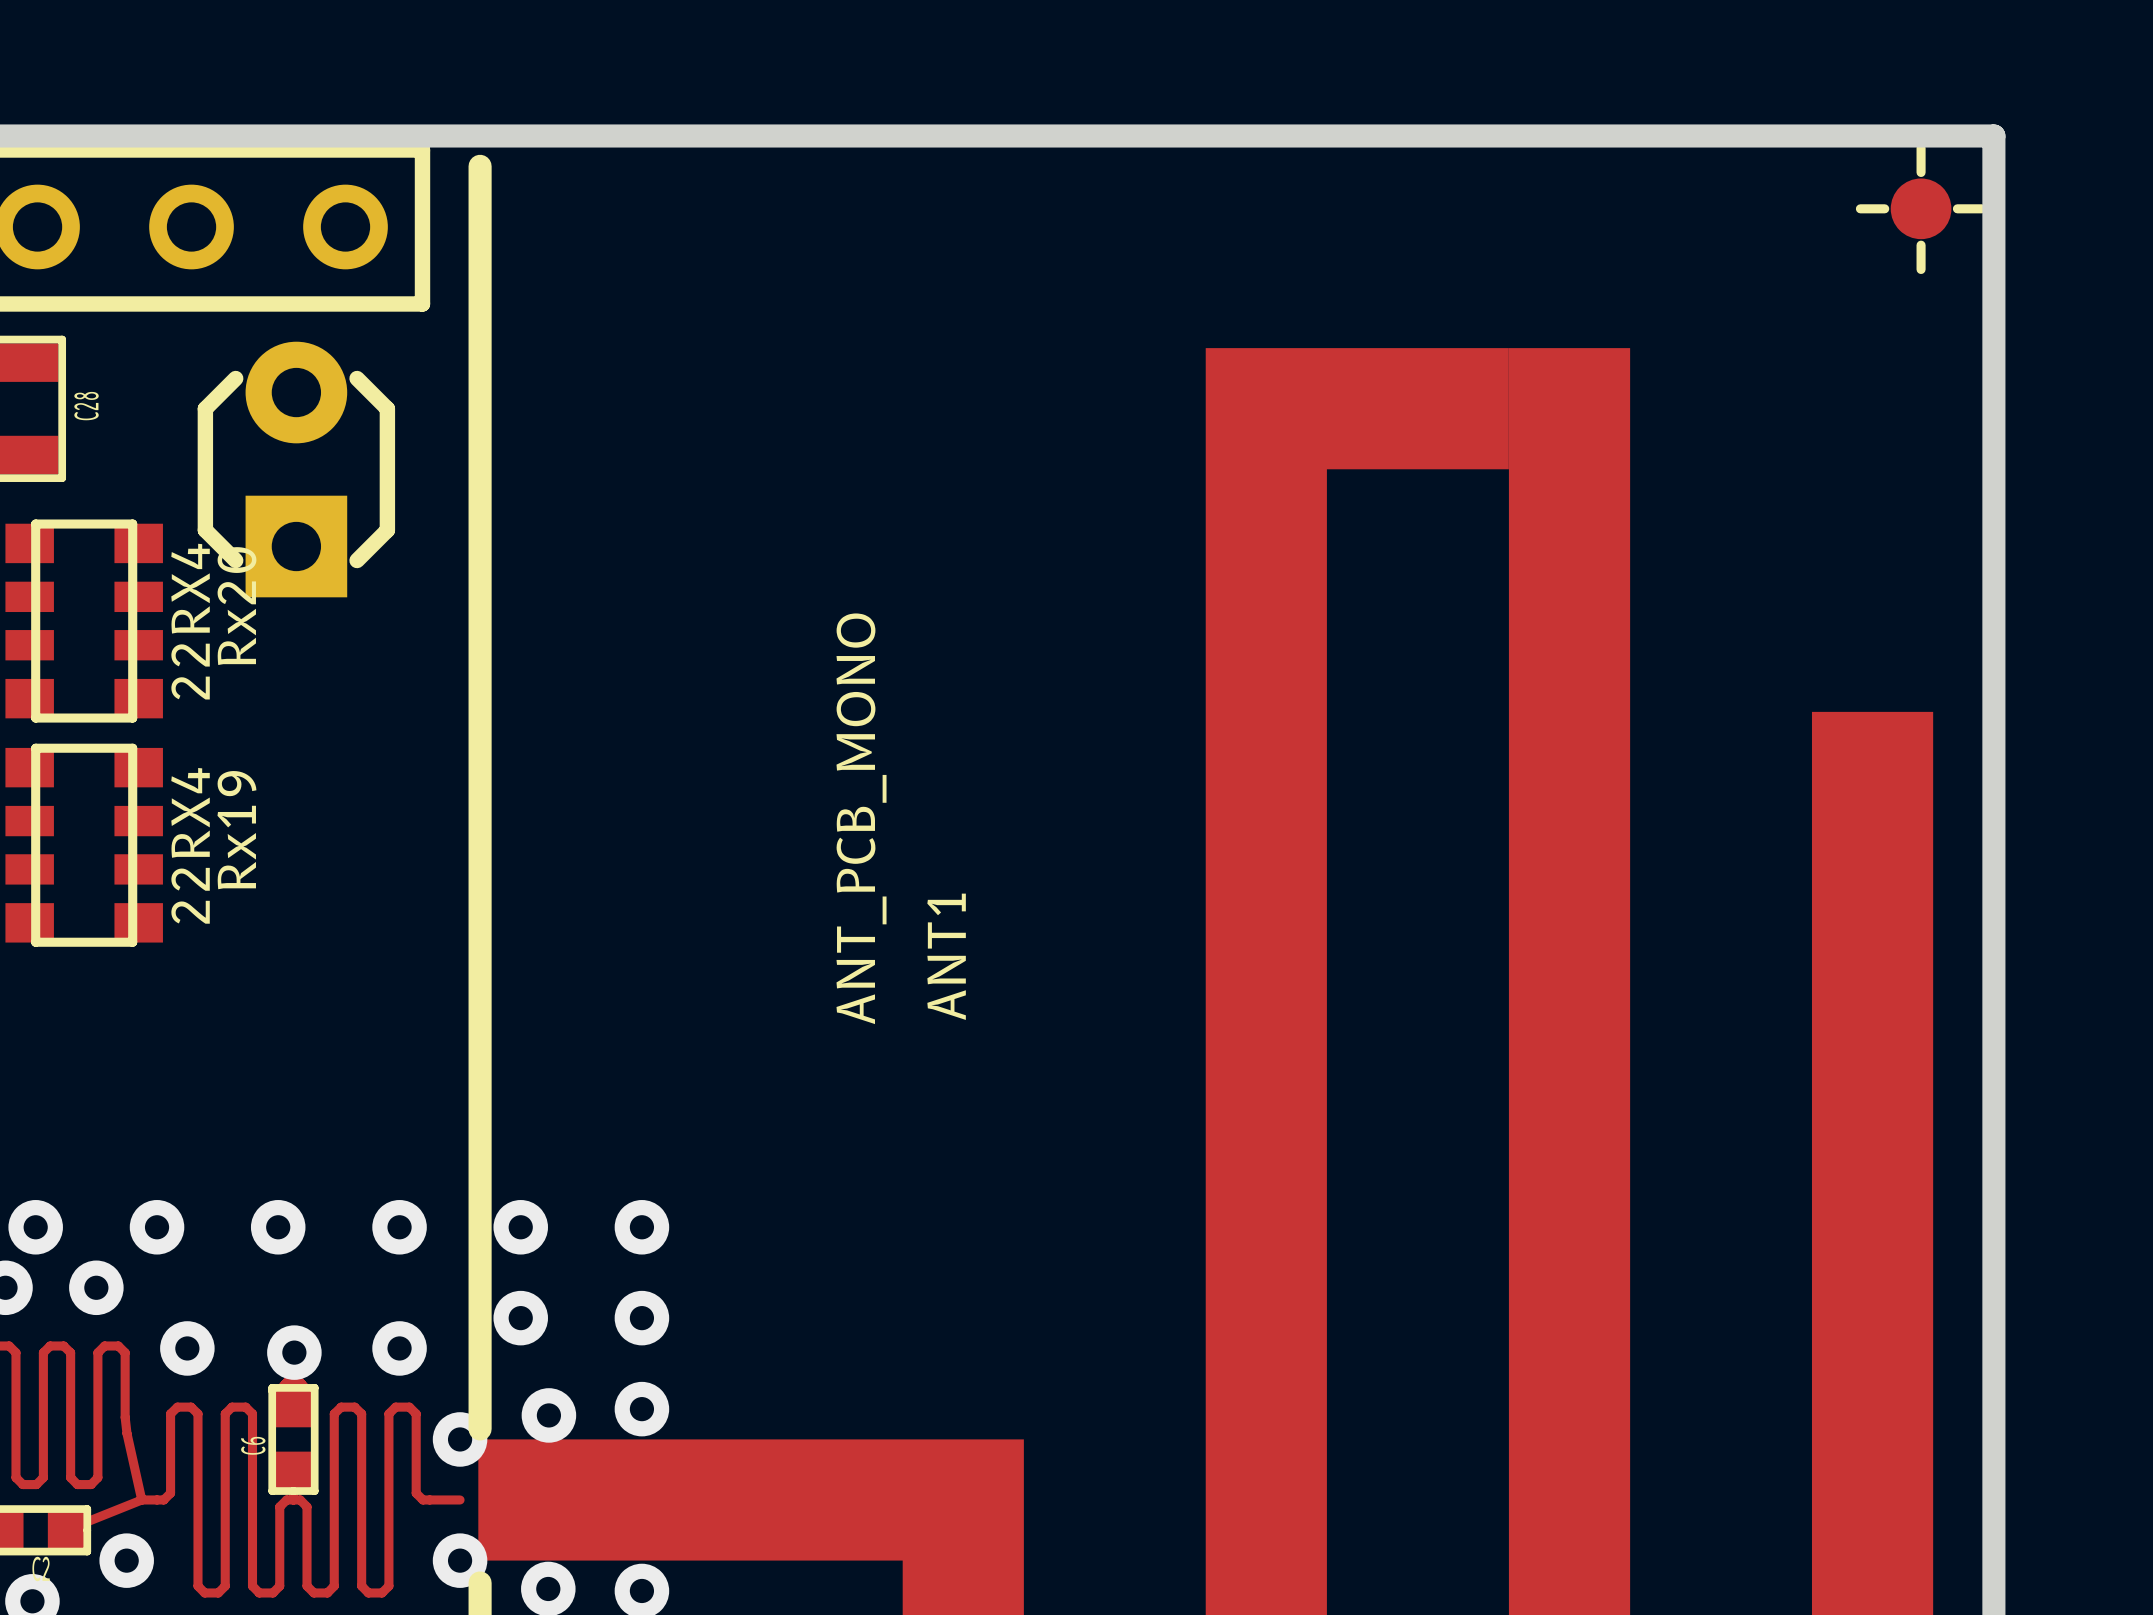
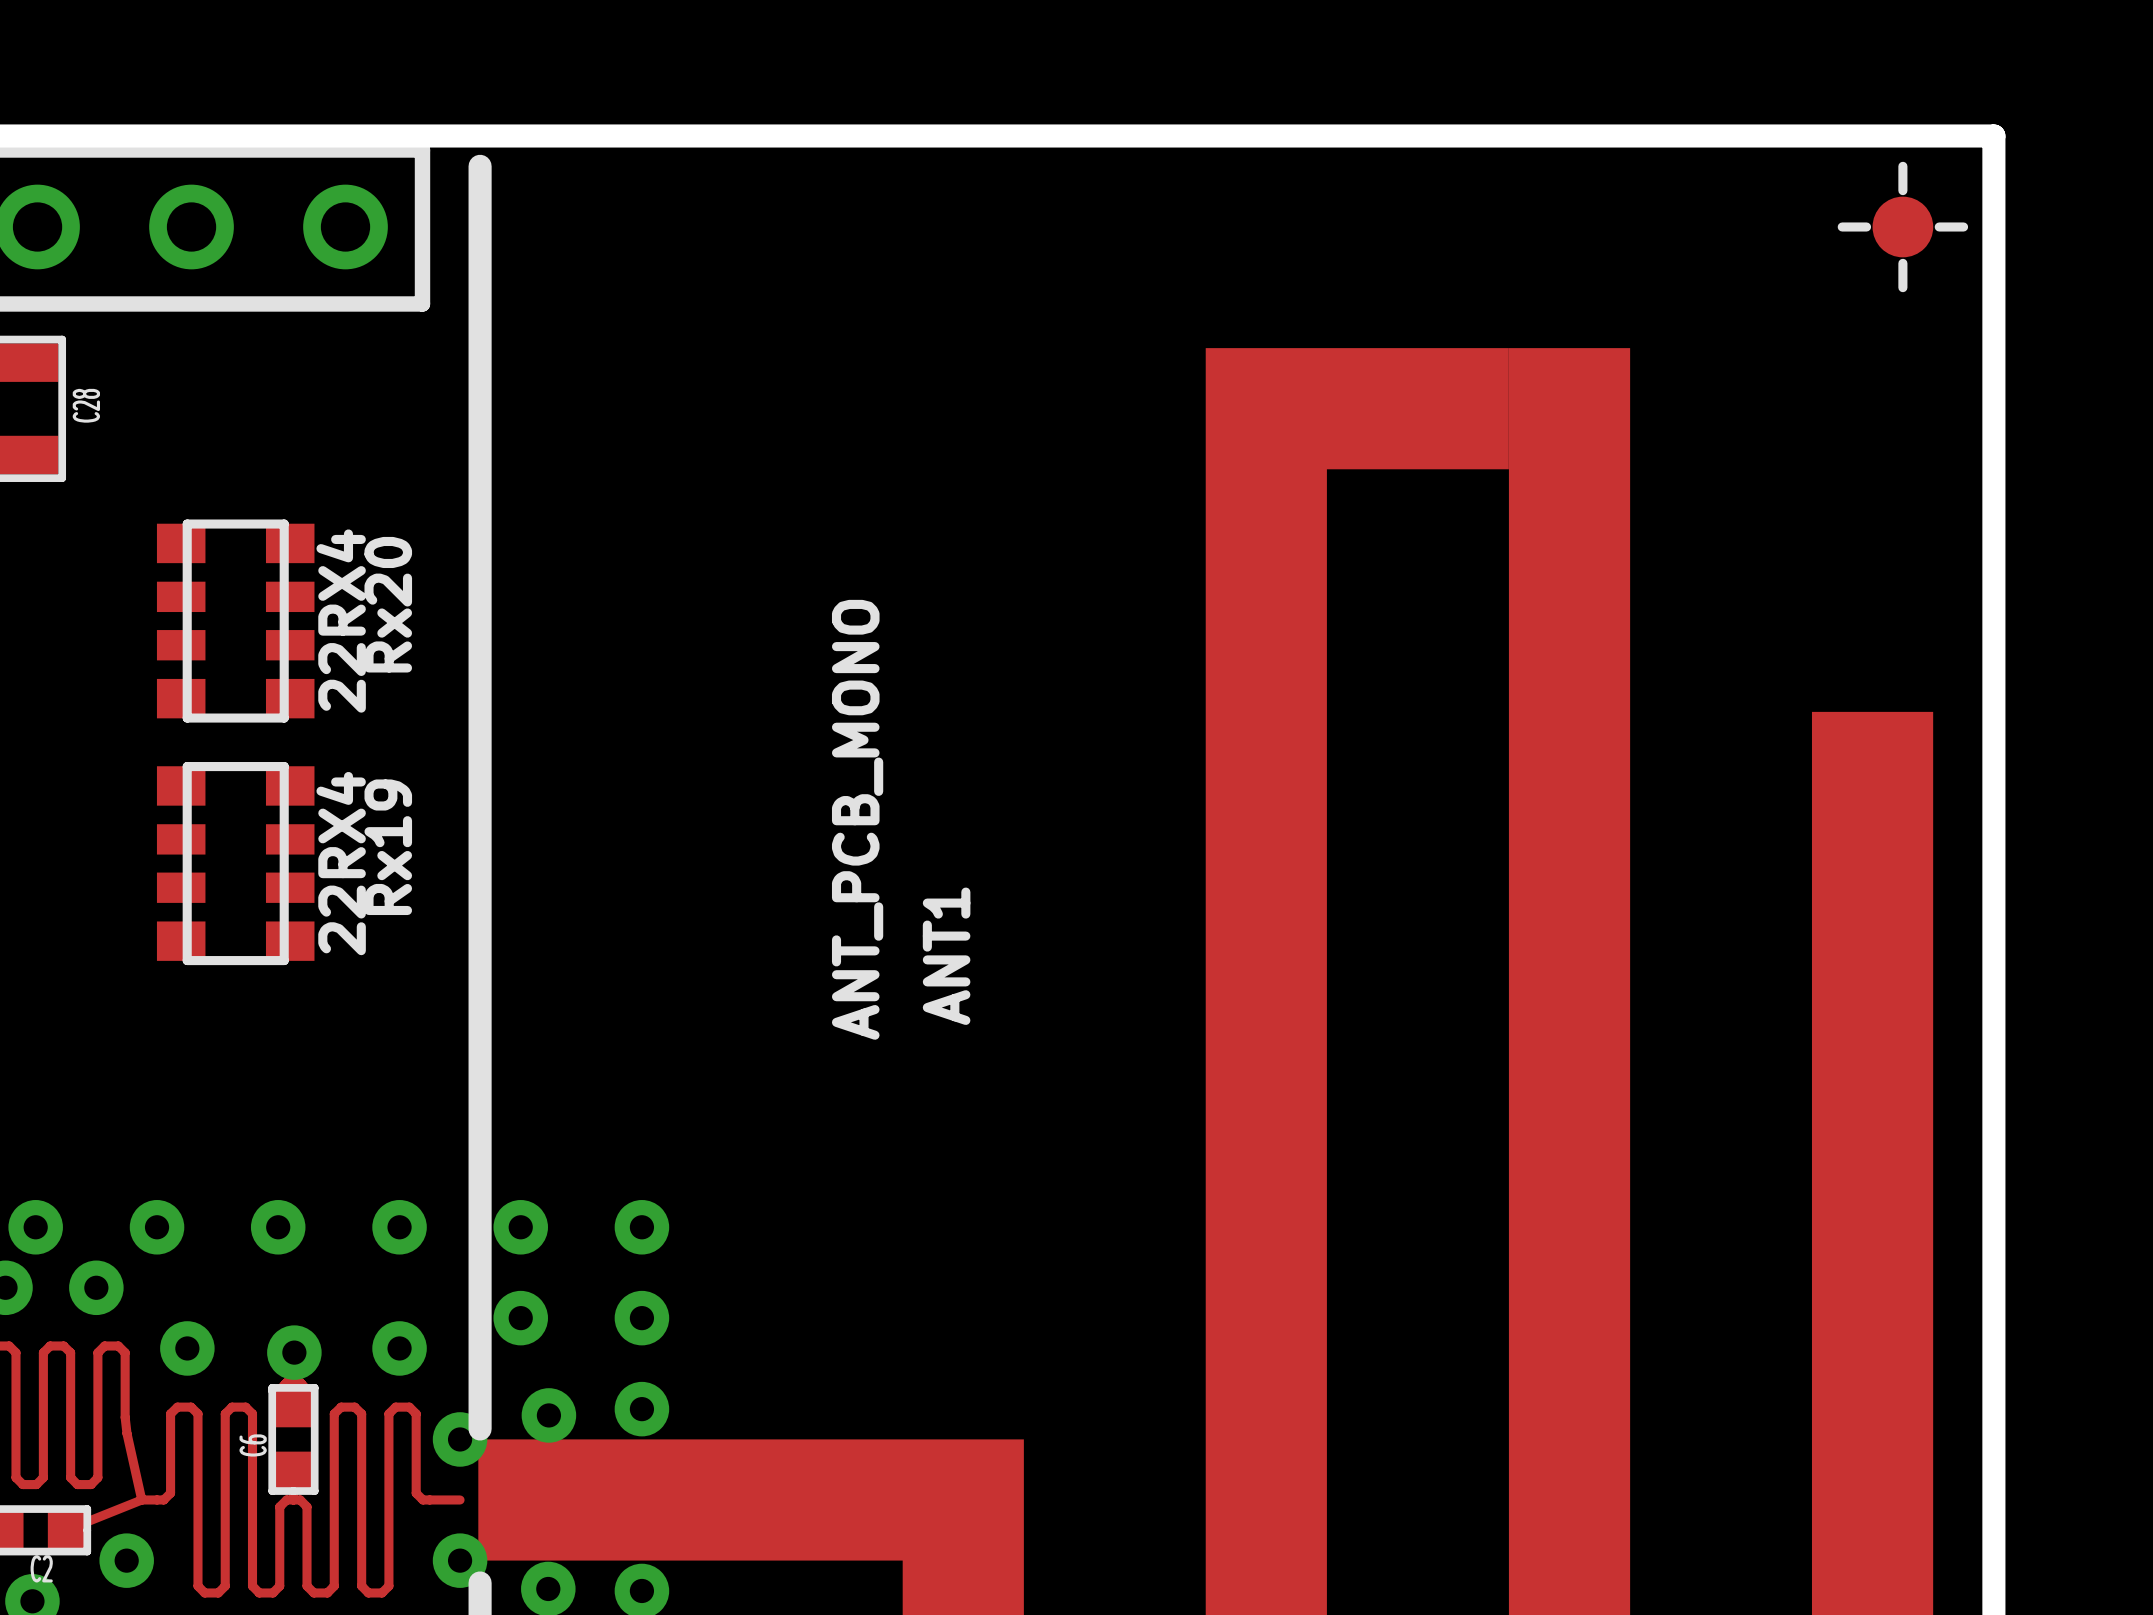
part position: (1921, 208) -> (1902, 226)
part: (296, 469) -> none
Rx20 position: (84, 621) -> (235, 621)
Rx19 position: (84, 845) -> (235, 863)

